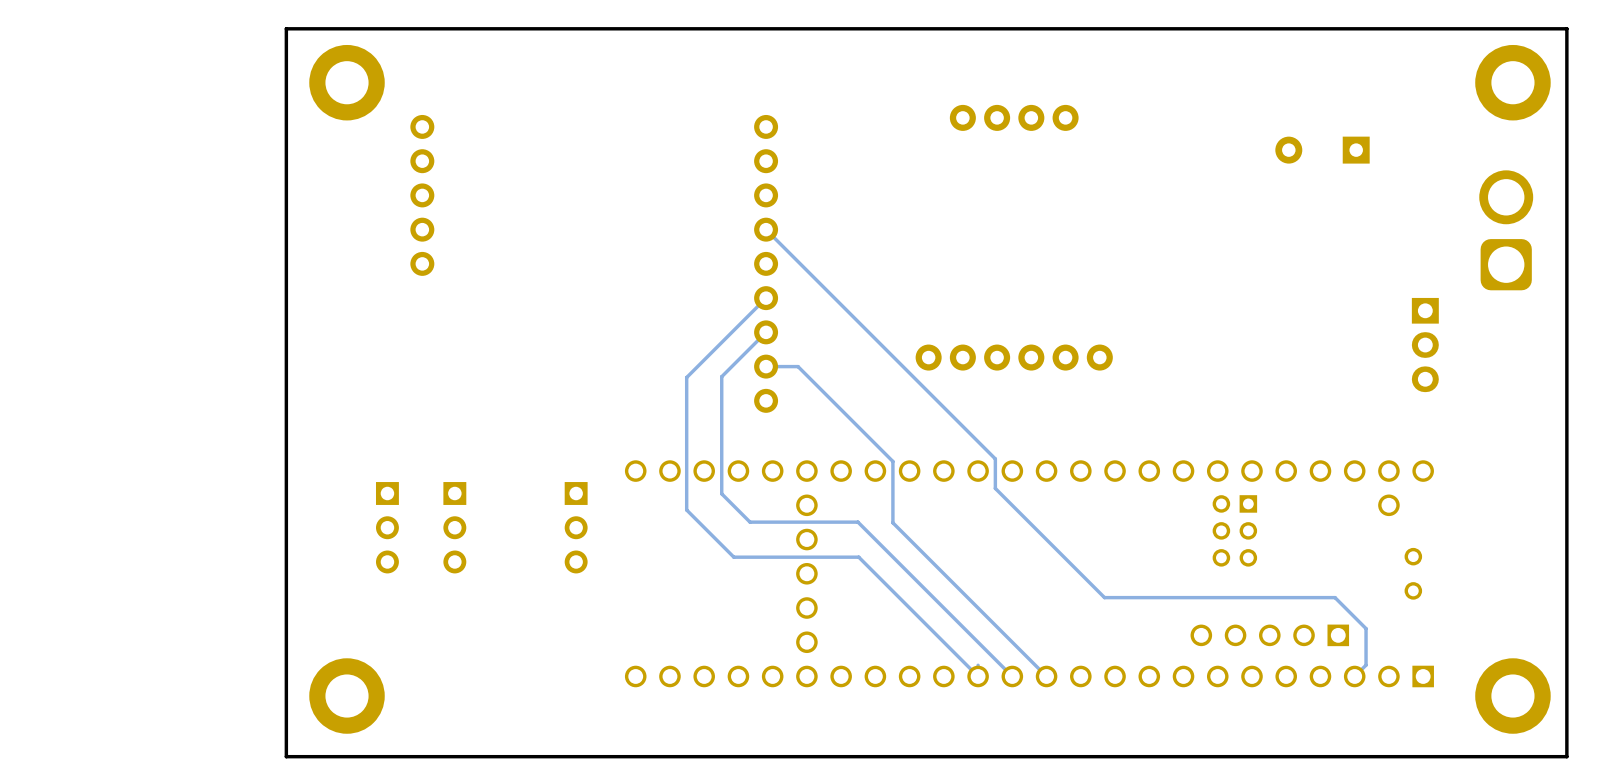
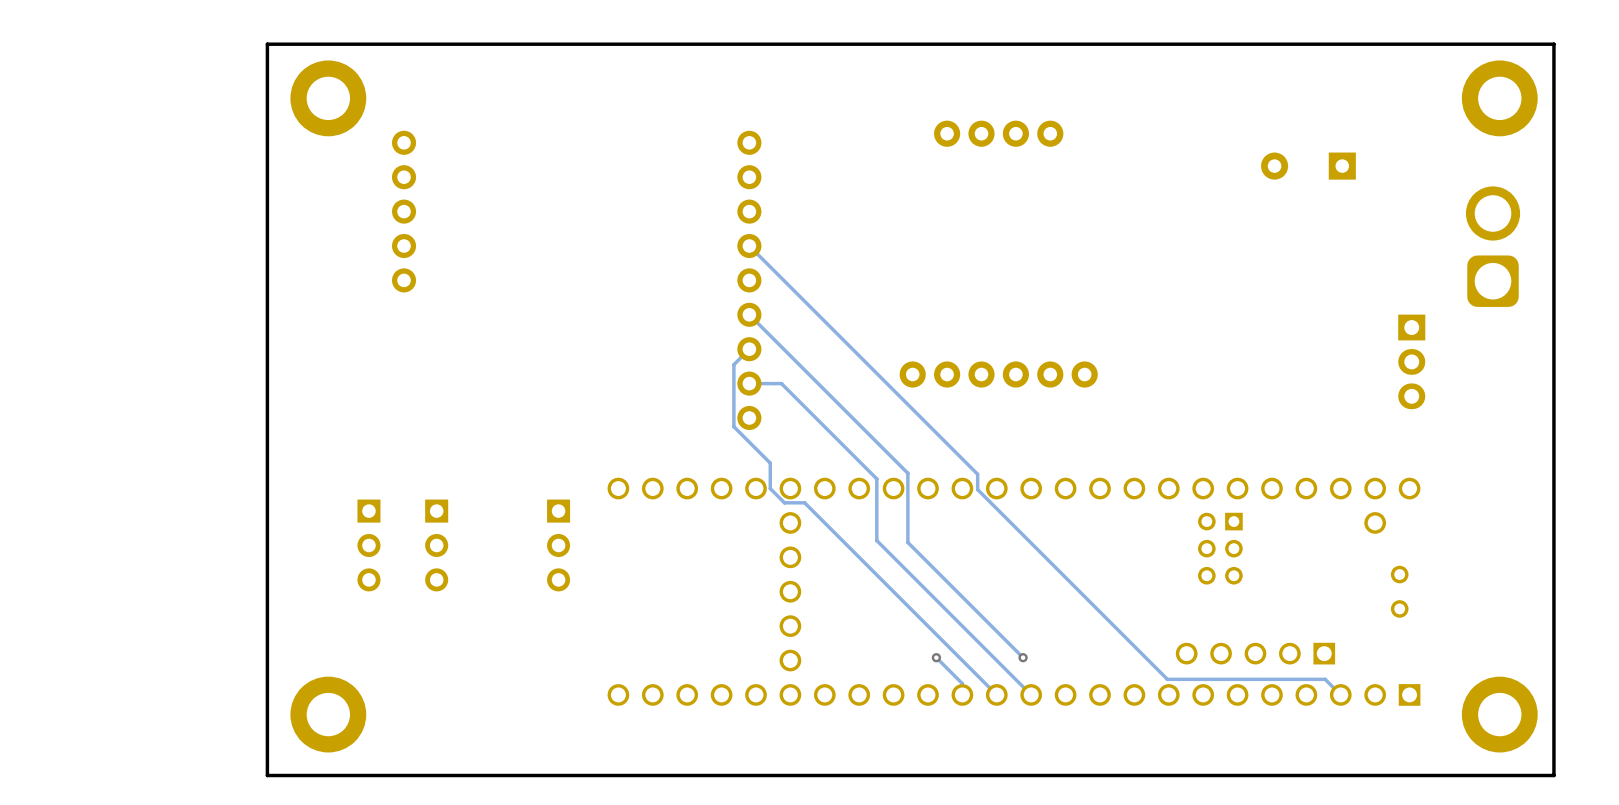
track: (766, 298) (686, 377) (686, 510) (733, 557) (858, 557) (978, 676) -> (749, 314) (907, 473) (907, 542) (1023, 657)
track: (750, 347) (721, 376) (721, 493) (750, 522) (857, 522) -> (733, 364) (733, 426) (770, 463) (770, 488) (784, 502) (804, 502) (841, 539)
track: (993, 456) (995, 458) (995, 488) (1104, 597) (1335, 597) (1366, 628) (1366, 665) (1354, 676) (1350, 676) -> (977, 474) (977, 489) (1167, 679) (1325, 679) (1340, 694)
track: none -> (936, 657) (962, 683)
via: none -> (936, 657)
via: none -> (1023, 657)

